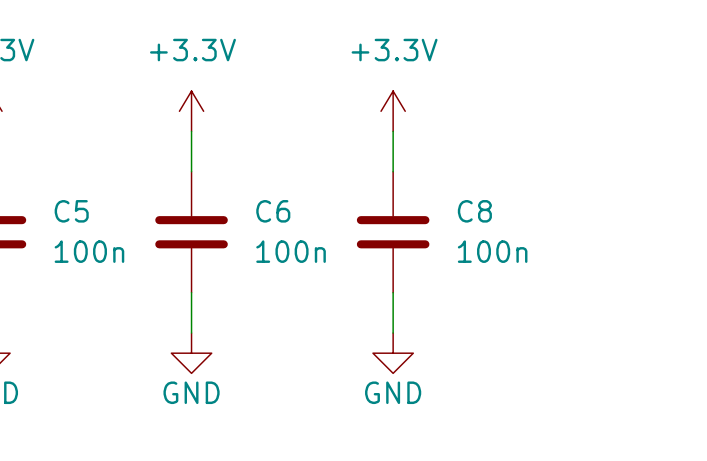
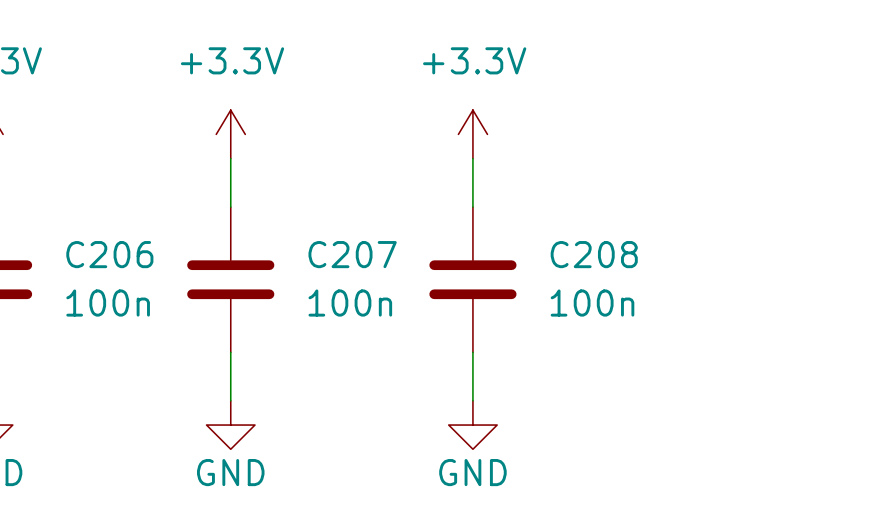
C5 name: C5 (71, 211) -> C206 (109, 254)
C6 name: C6 (273, 211) -> C207 (352, 254)
C8 name: C8 (474, 211) -> C208 (594, 254)

